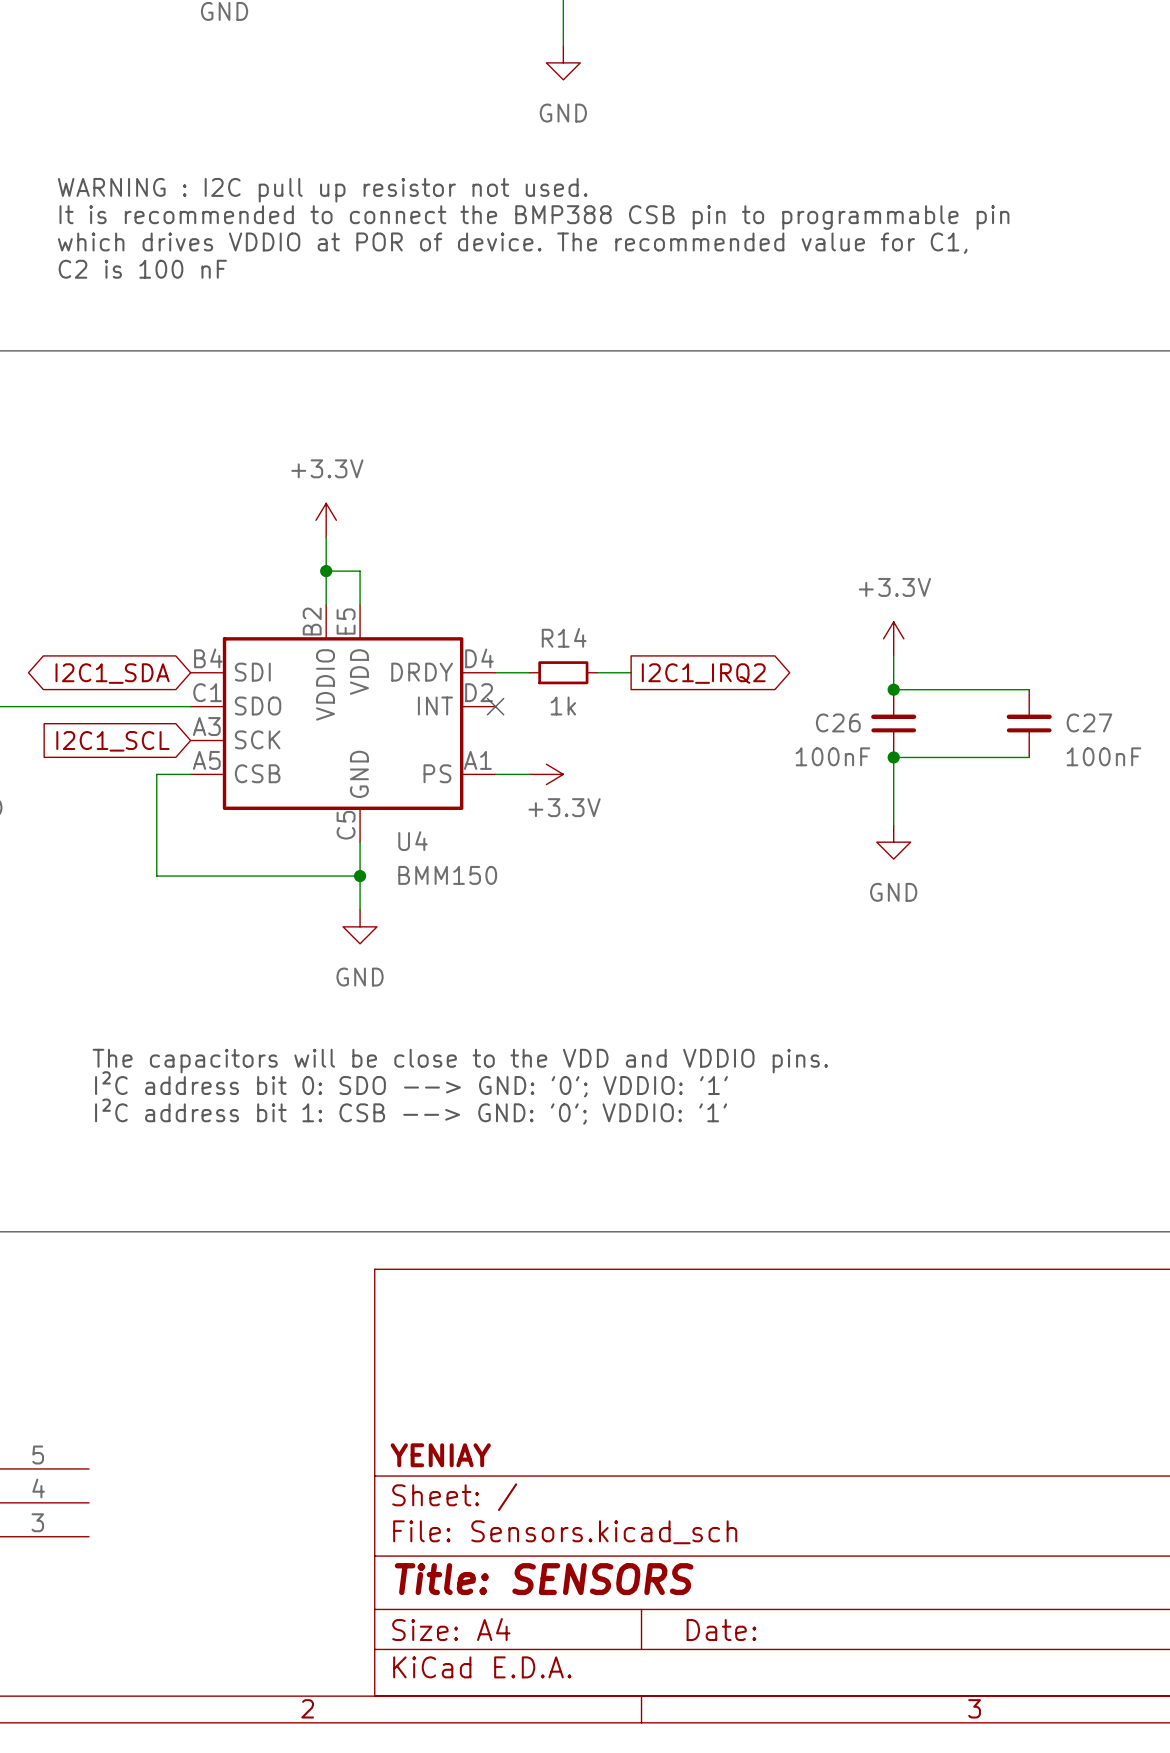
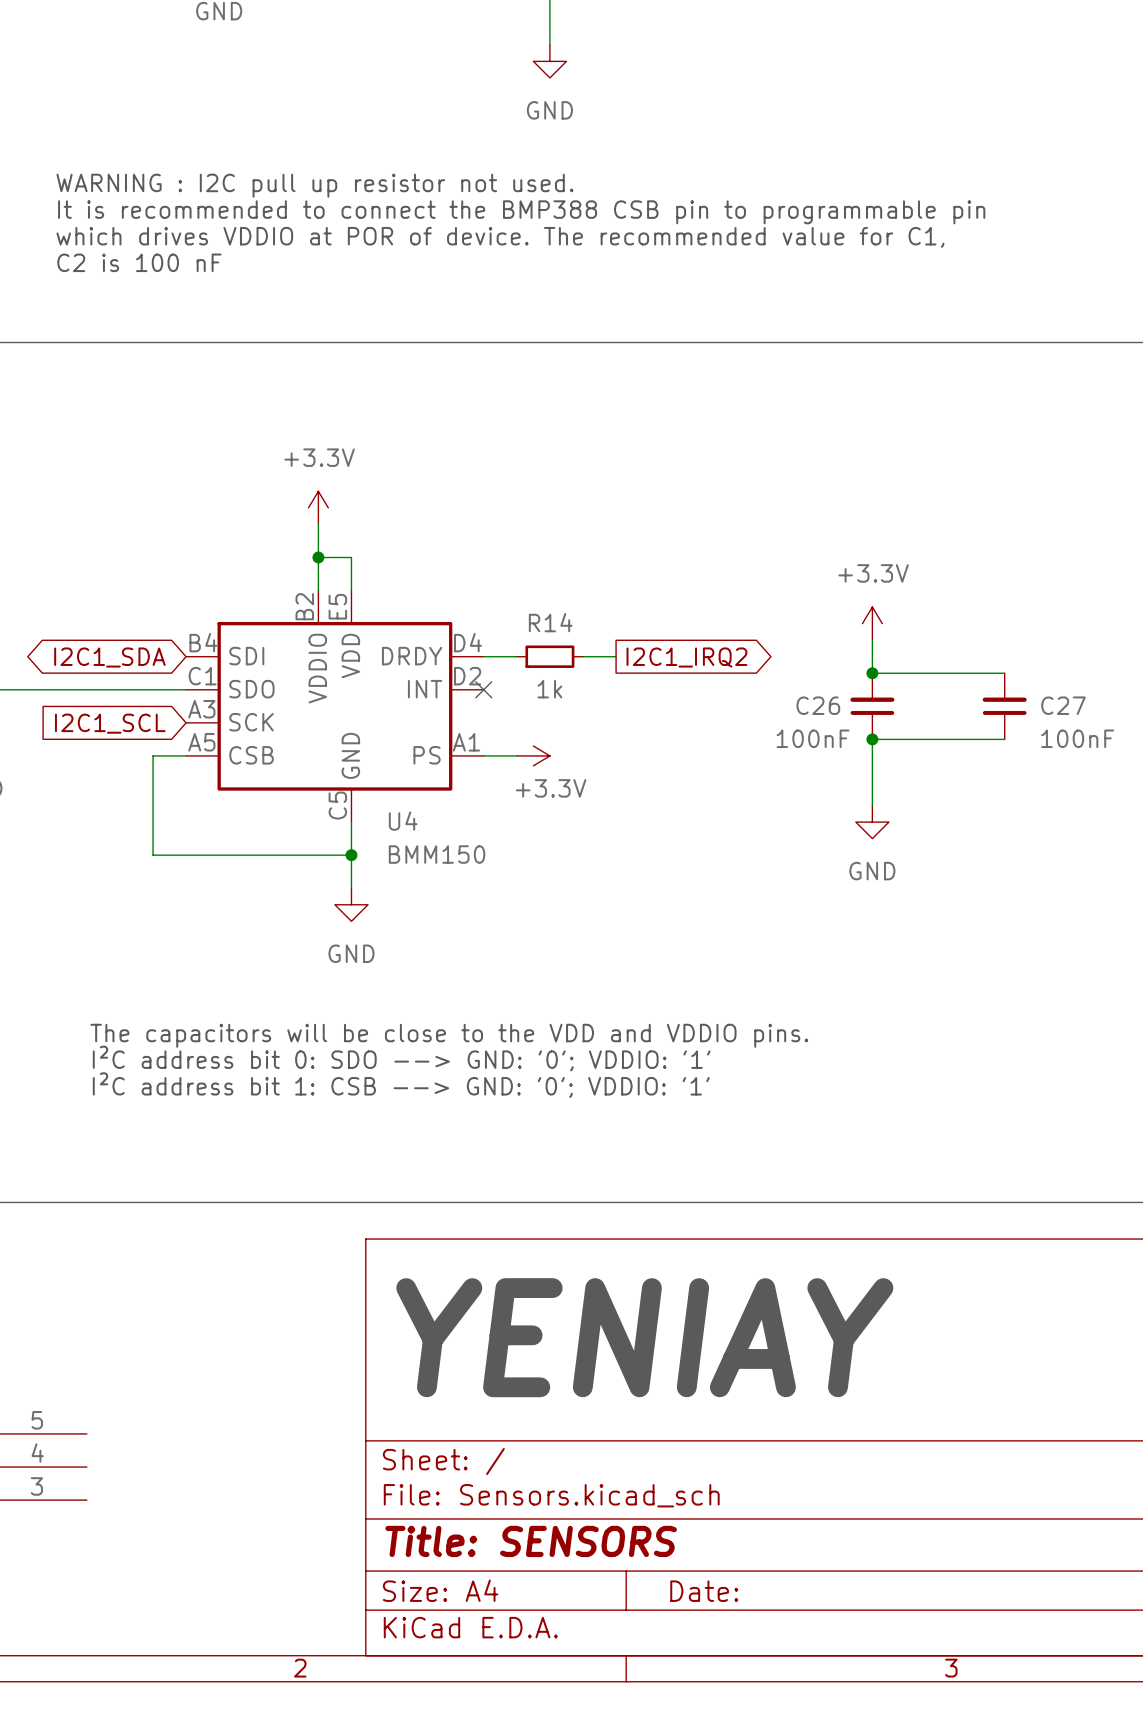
text: none -> YENIAY (644, 1337)
title block: YENIAY (440, 1455) -> none

